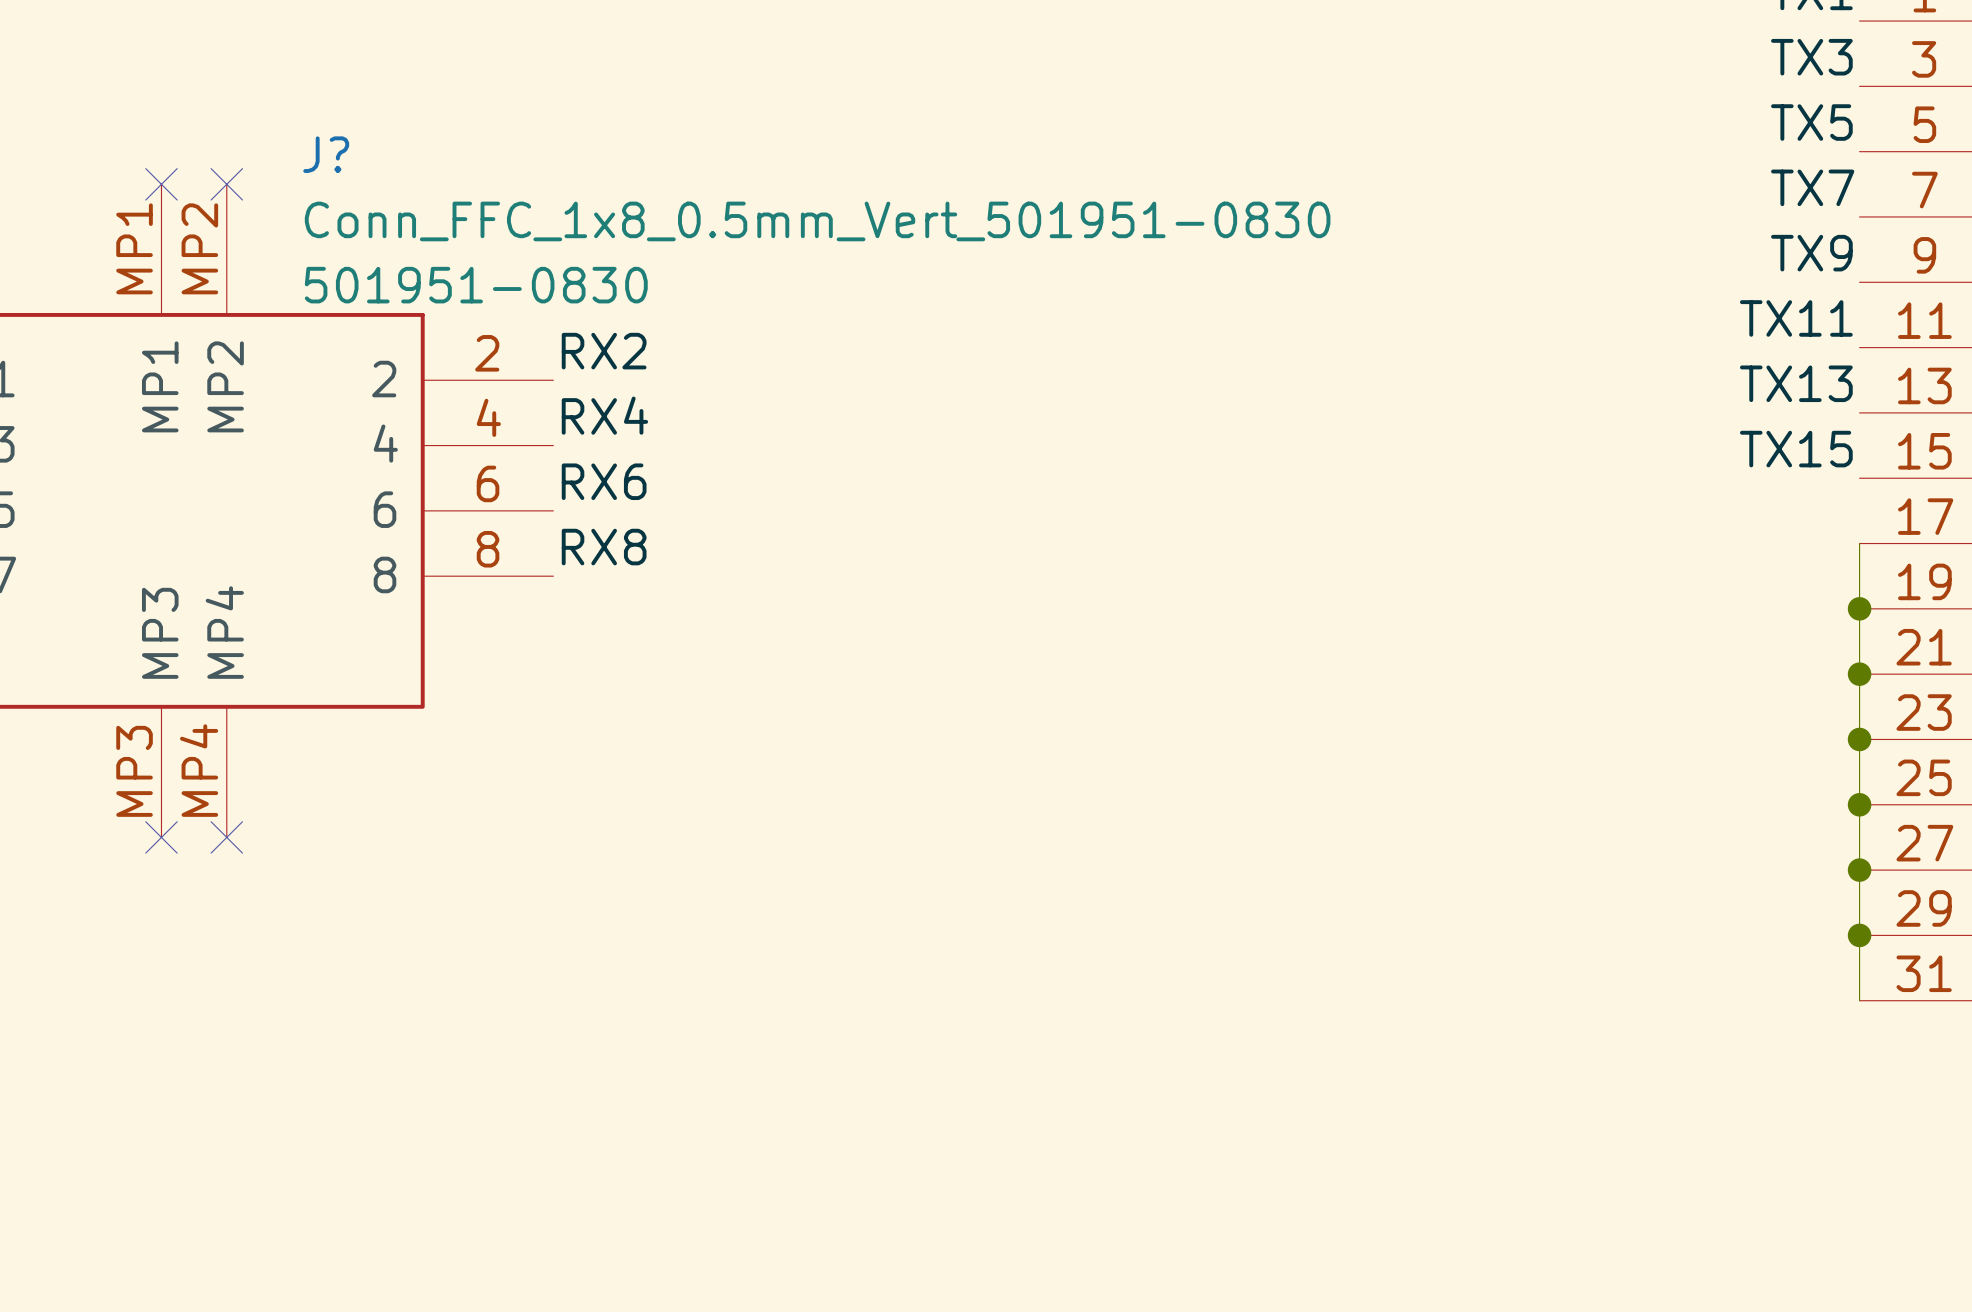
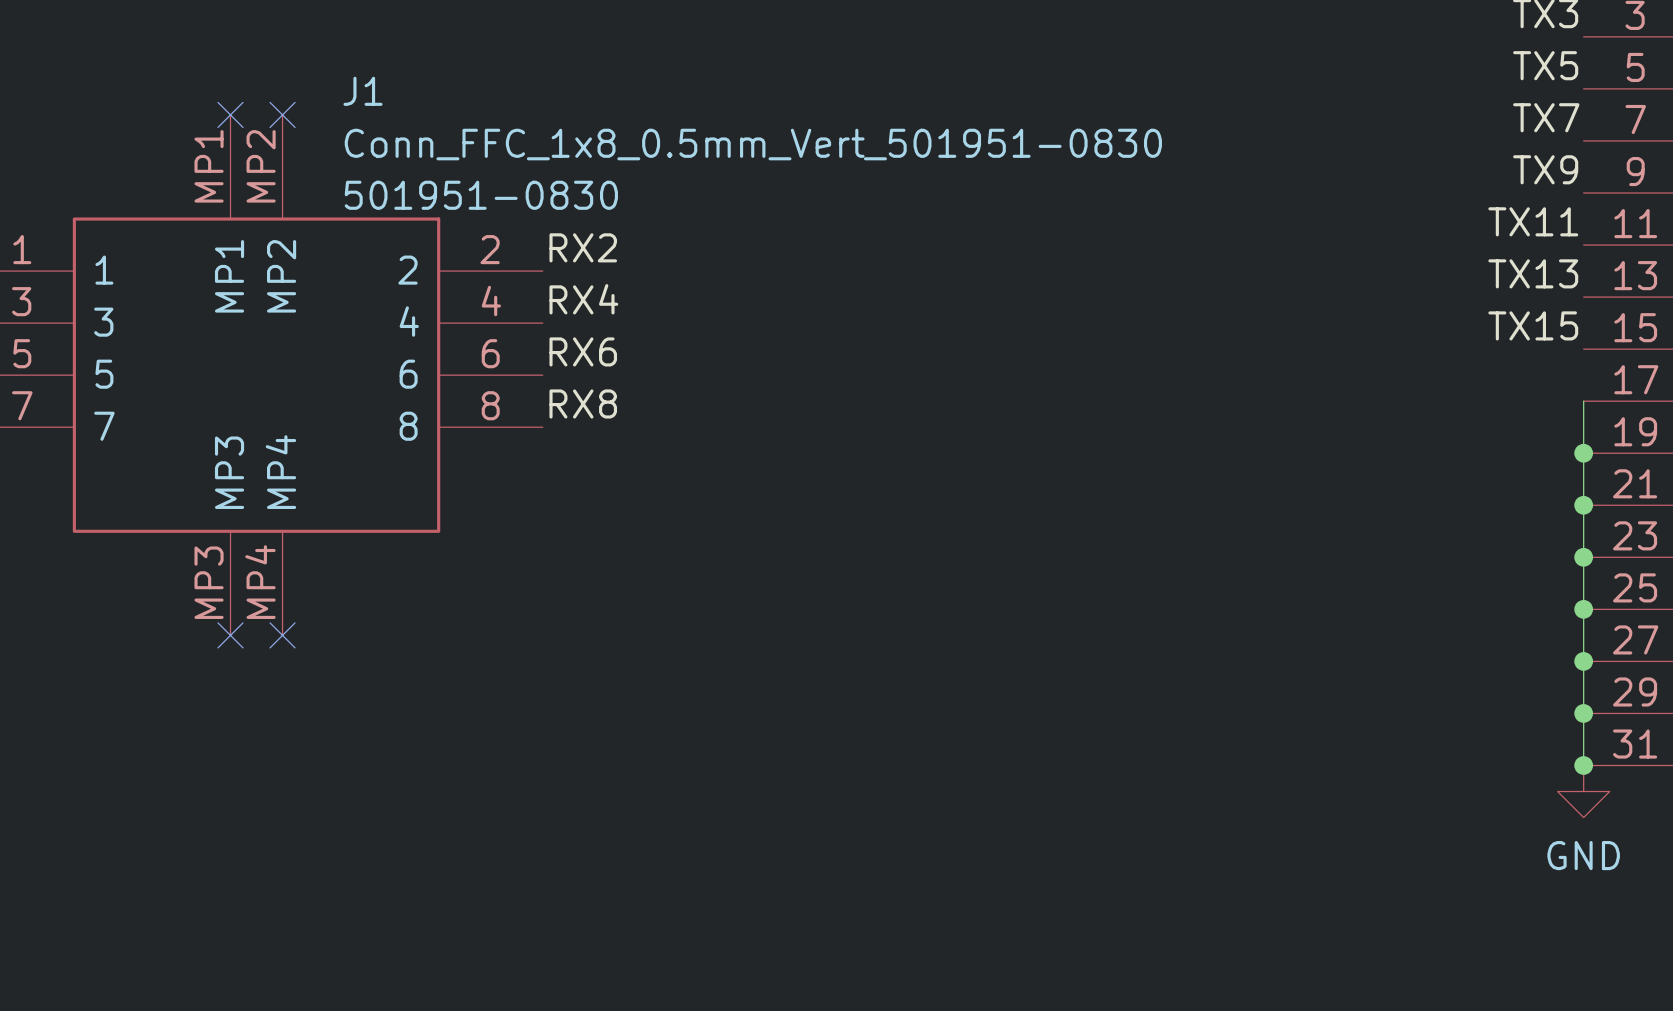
J? name: J? (326, 154) -> J1 (363, 91)
junction: none -> (1583, 765)
power symbol: none -> GND (1583, 791)

